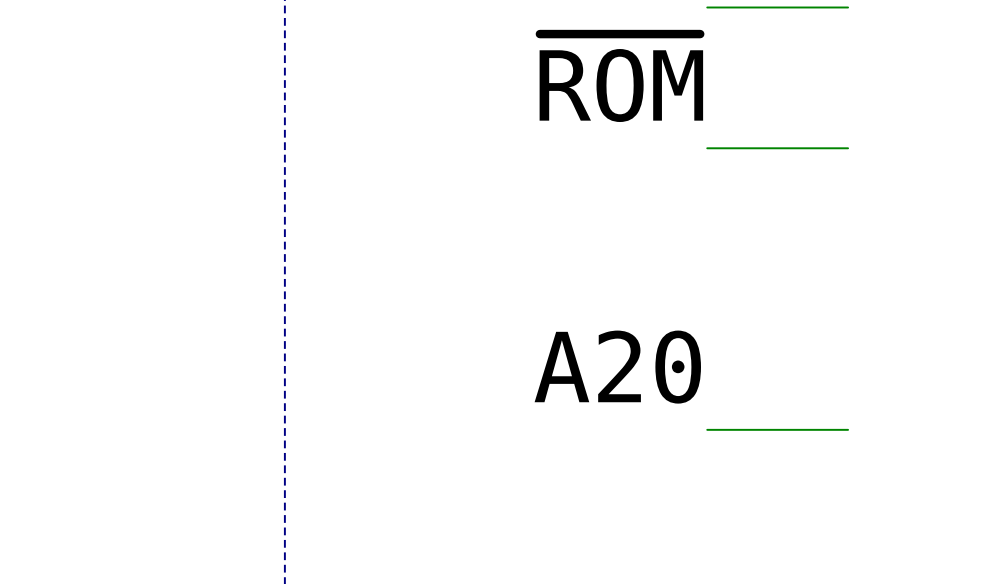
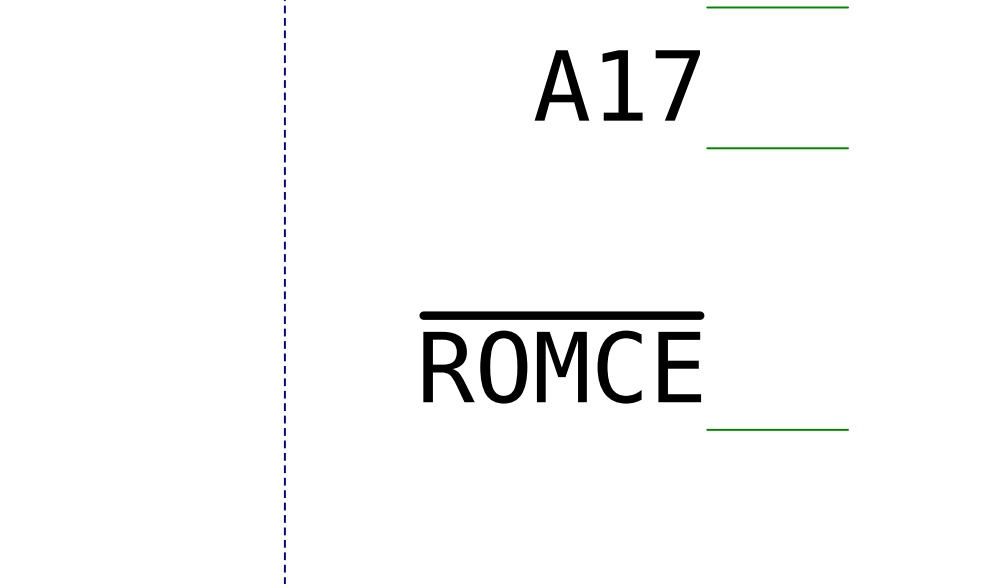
label: ~{ROM} (621, 78) -> A17 (617, 85)
label: A20 (617, 367) -> ~{ROMCE} (562, 359)

